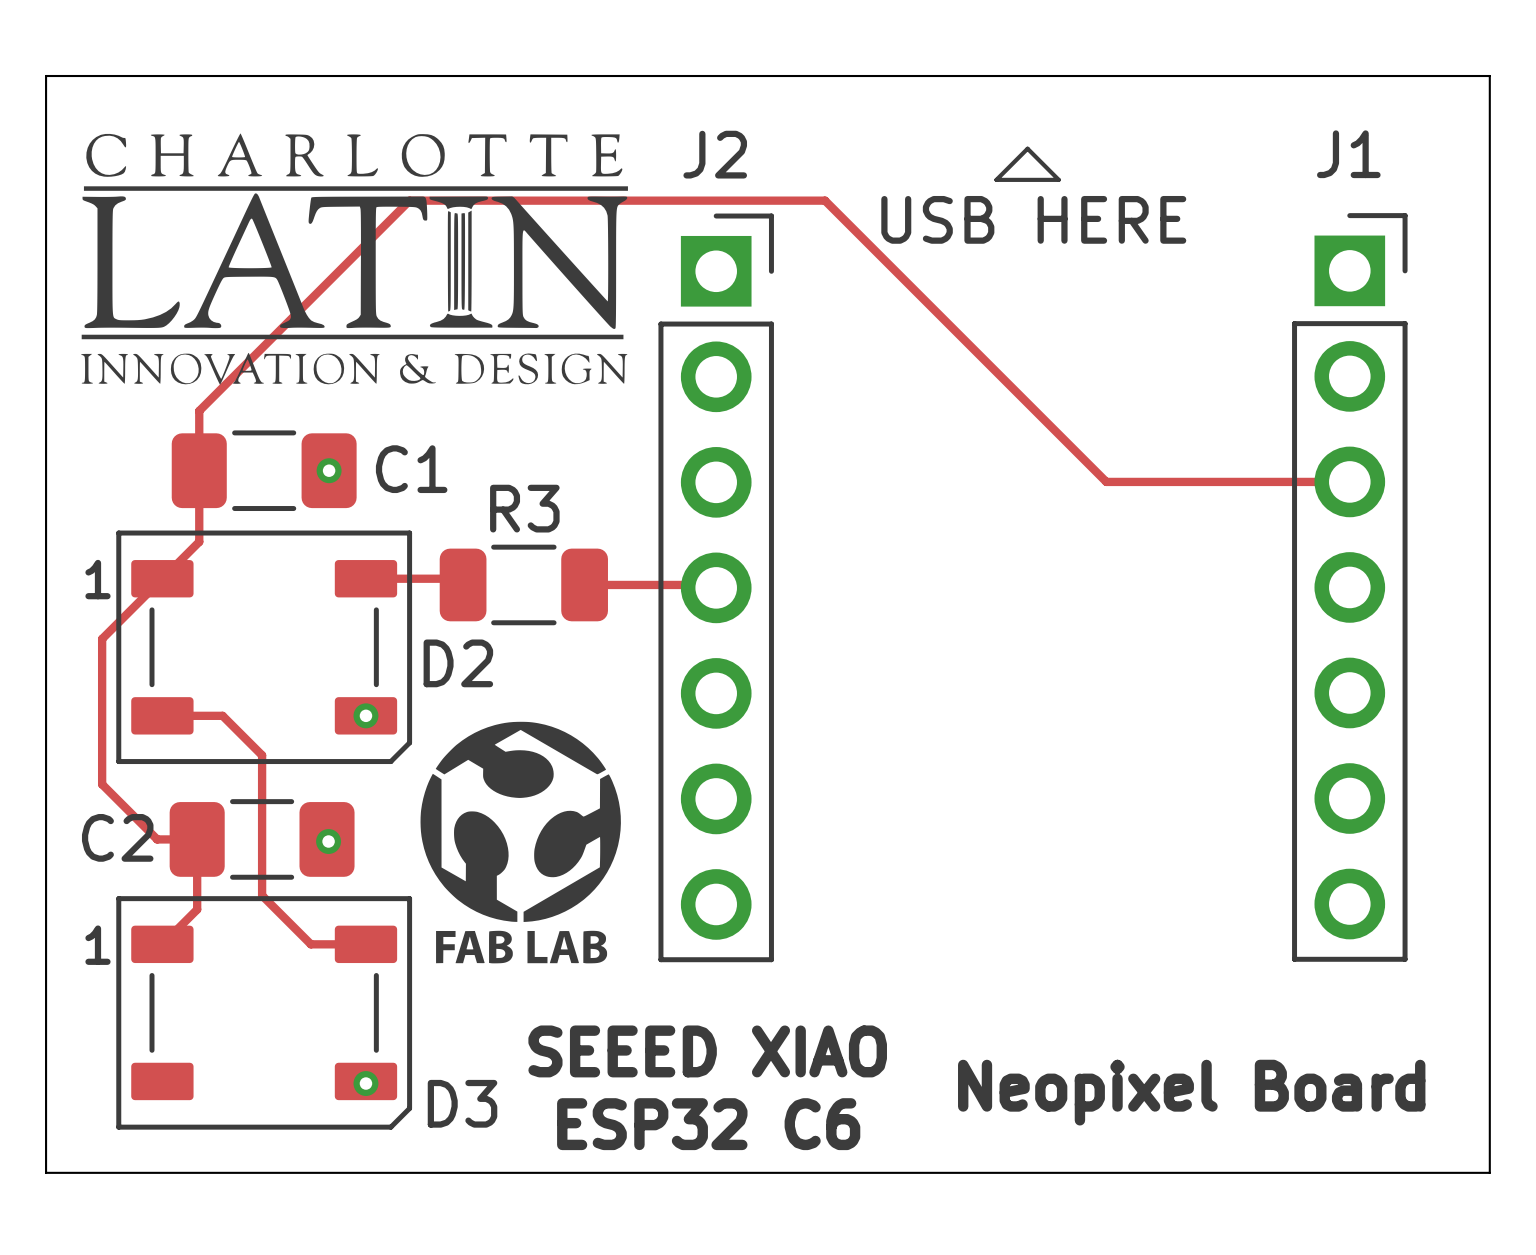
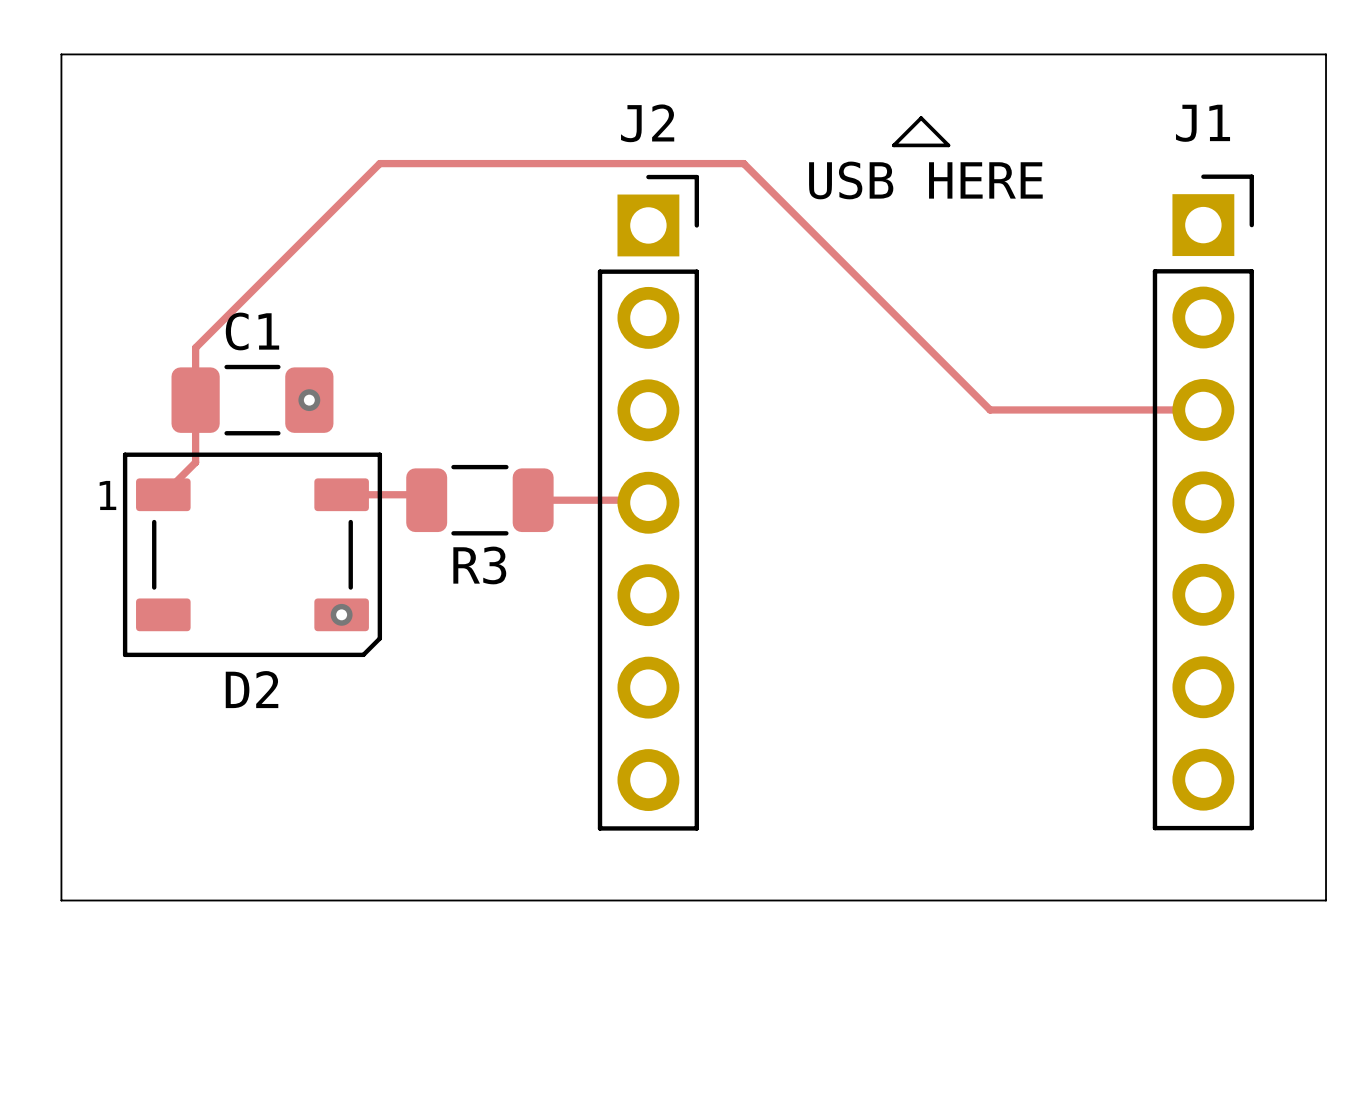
drawing: [81, 133, 628, 385] -> none
C1 name position: C1 (411, 469) -> C1 (252, 331)
R3 name position: R3 (524, 508) -> R3 (479, 565)
track: (162, 578) (102, 638) (102, 784) (157, 839) (197, 839) (197, 909) (162, 944) -> none
D2 name position: D2 (458, 663) -> D2 (252, 689)
track: (162, 715) (222, 715) (262, 755) (262, 895) (310, 944) (365, 944) -> none
drawing: [420, 721, 621, 964] -> none
C2: (262, 839) -> none
via: (328, 841) -> none
D3: (264, 1012) -> none
board edge: (46, 1041) (46, 1172) (1489, 1172) (1489, 1041) -> (61, 900) (1326, 900)
text: SEEED XIAO (707, 1051) -> none
via: (365, 1083) -> none
text: Neopixel Board (1191, 1092) -> none
text: ESP32 C6 (708, 1124) -> none

